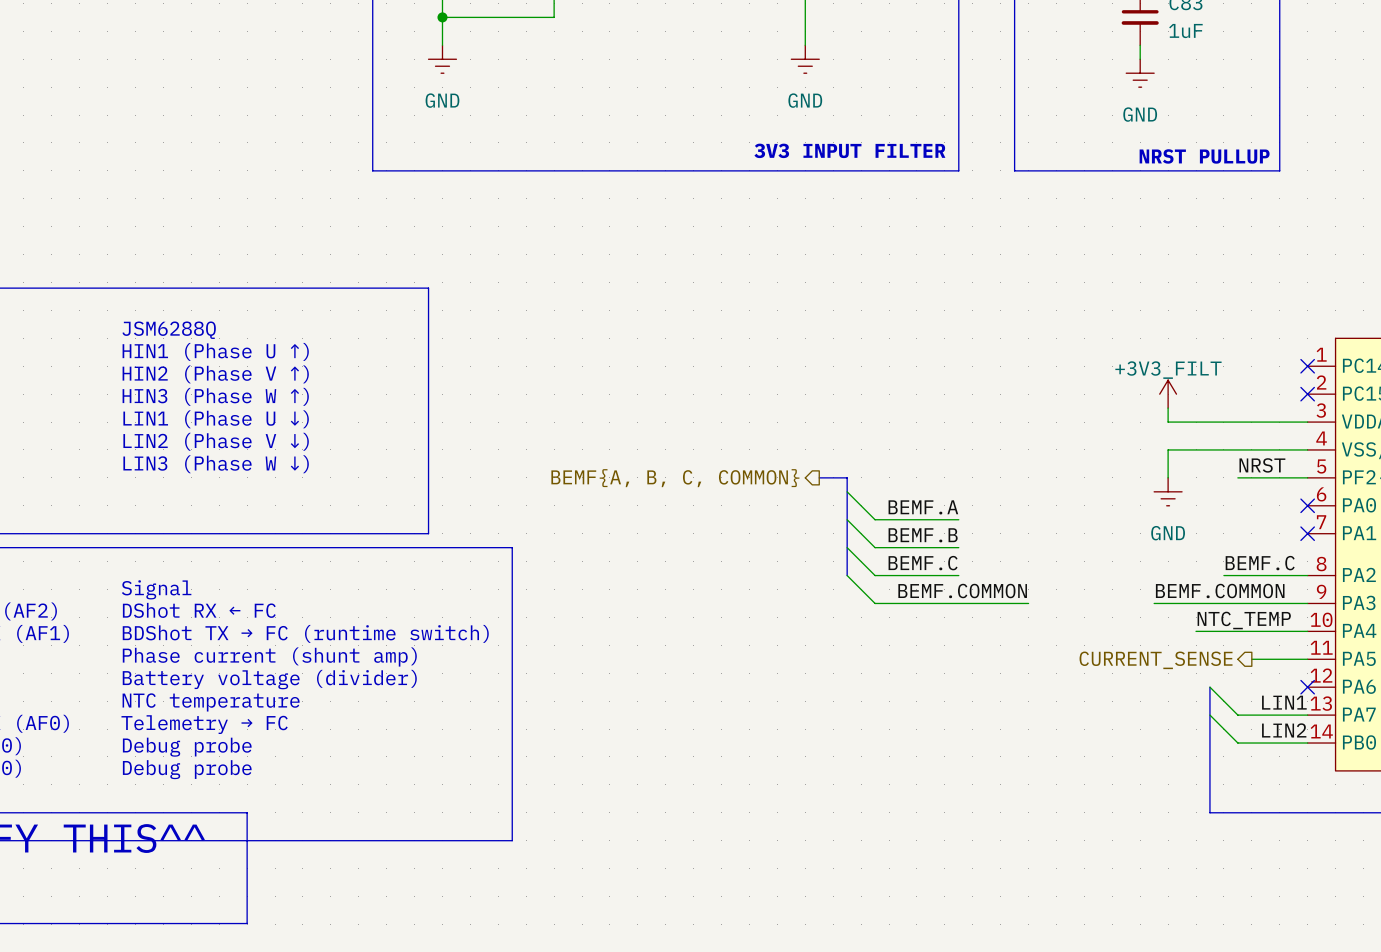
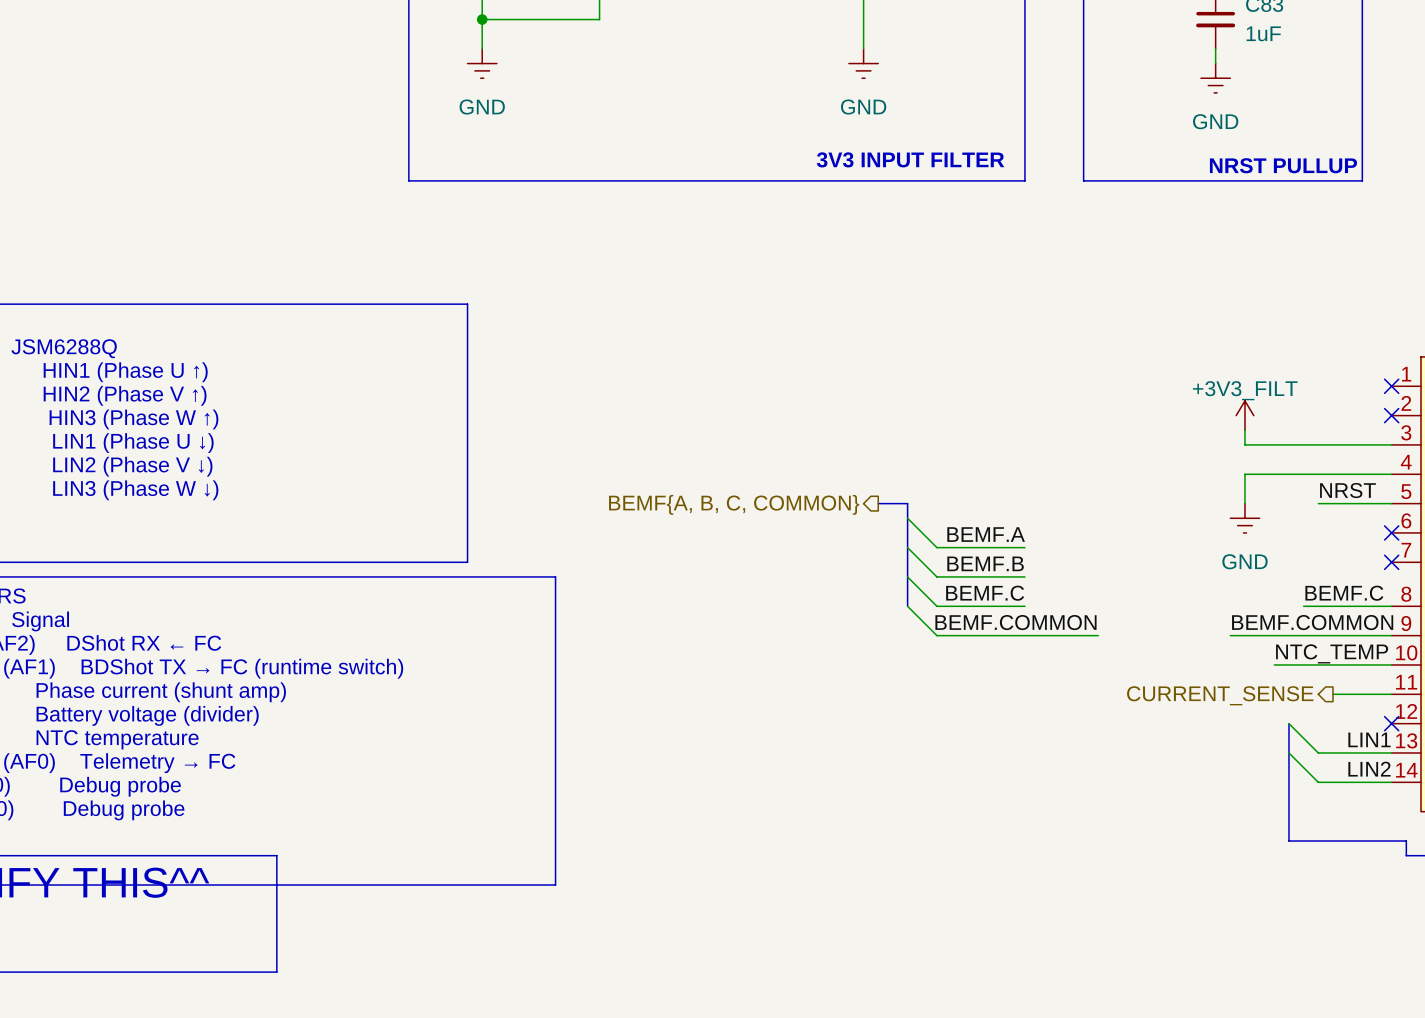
bus: (1209, 798) (1209, 812) (1321, 812) -> (1288, 841) (1406, 841) (1406, 855)

